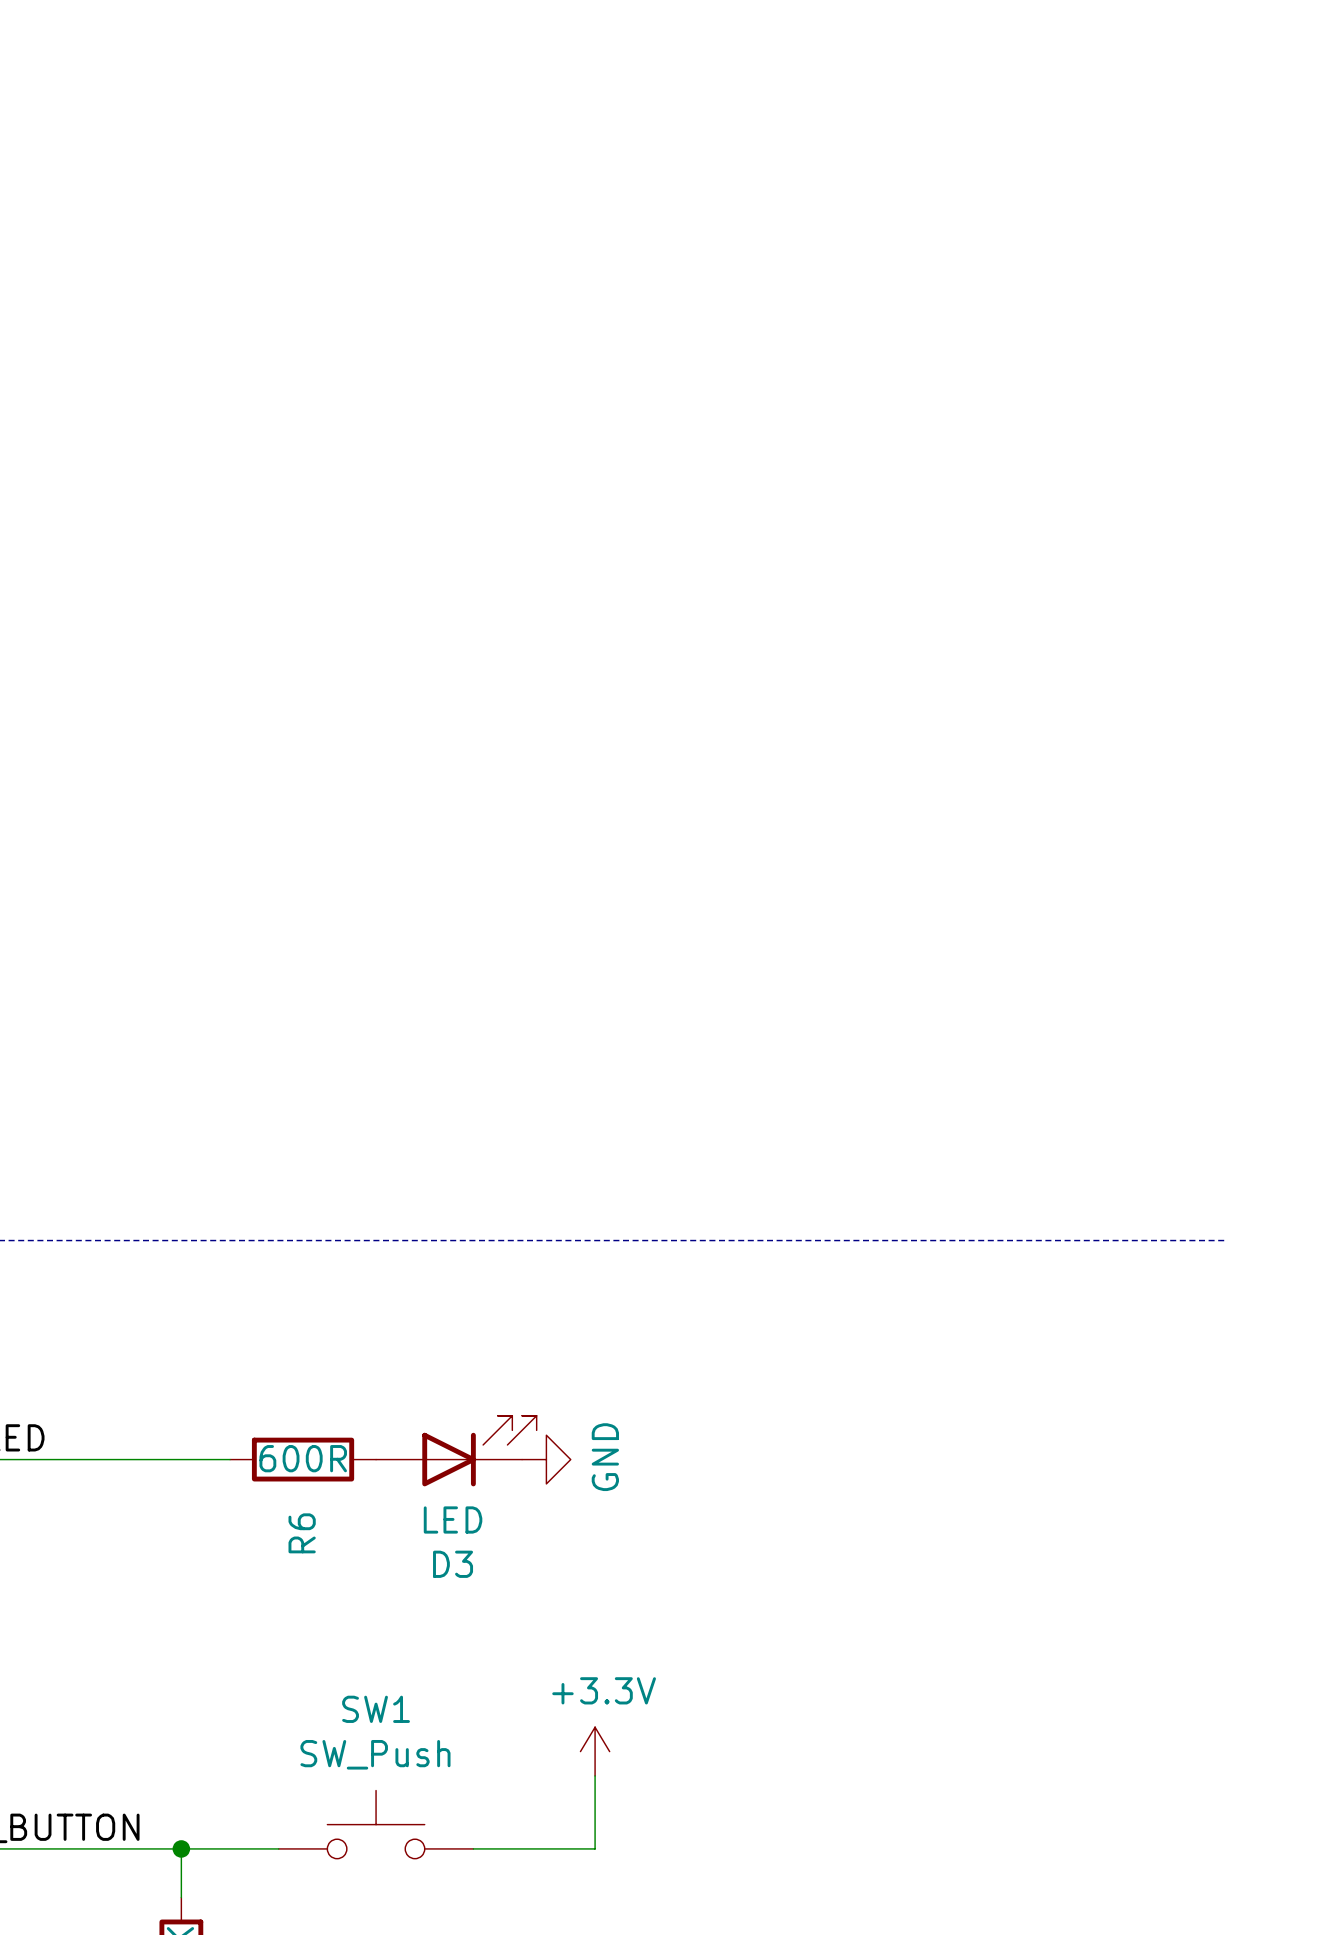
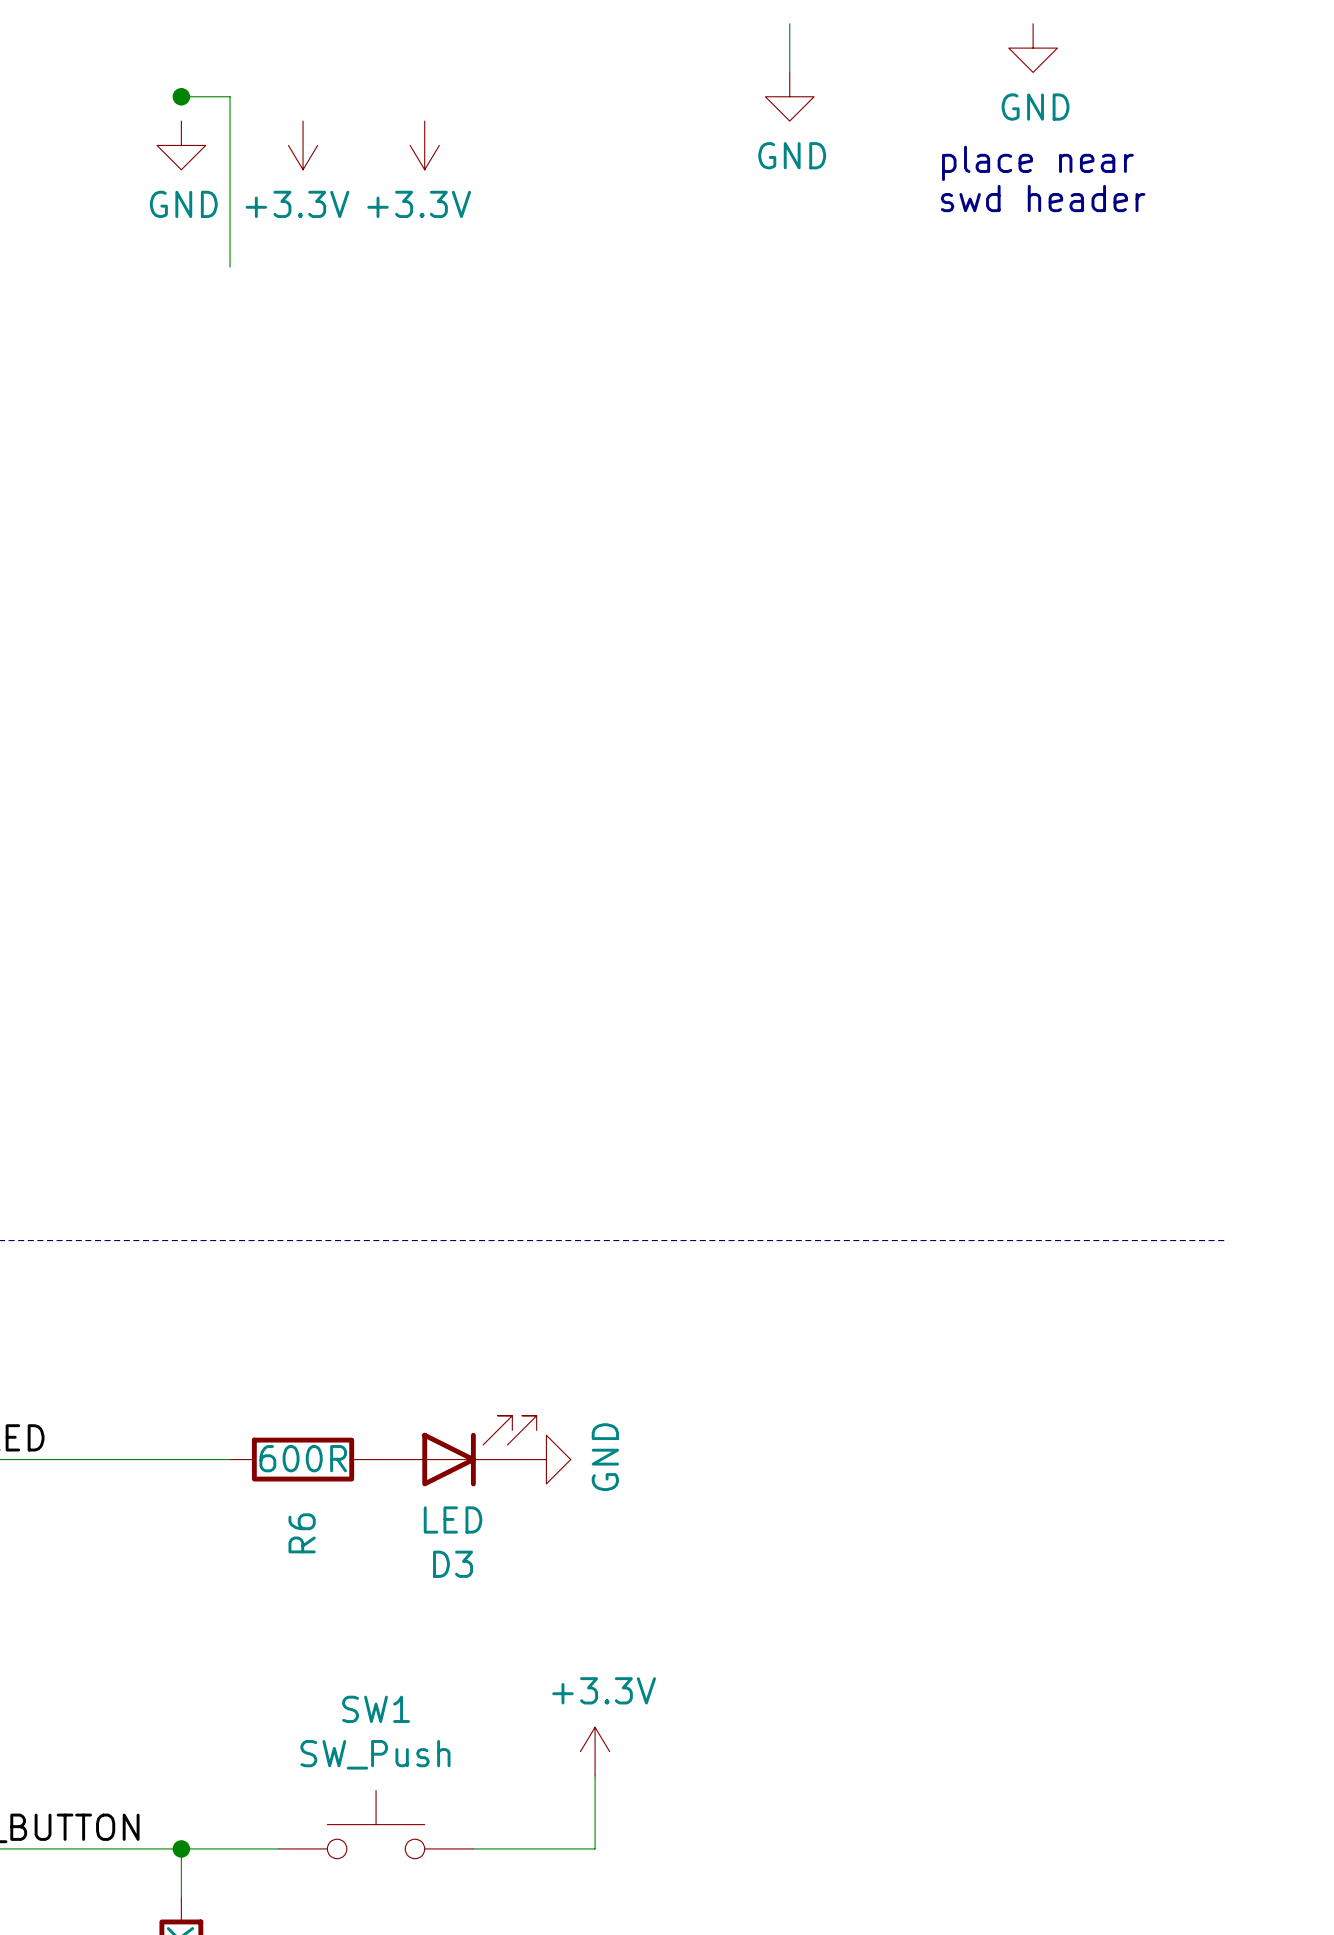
wire: none -> (789, 23) (789, 72)
power symbol: none -> GND (1033, 48)
wire: none -> (181, 96) (230, 96) (230, 267)
junction: none -> (181, 96)
power symbol: none -> GND (789, 96)
power symbol: none -> GND (181, 145)
power symbol: none -> +3.3V (303, 145)
power symbol: none -> +3.3V (424, 145)
text: none -> place near (1037, 163)
text: none -> swd header (1043, 198)

